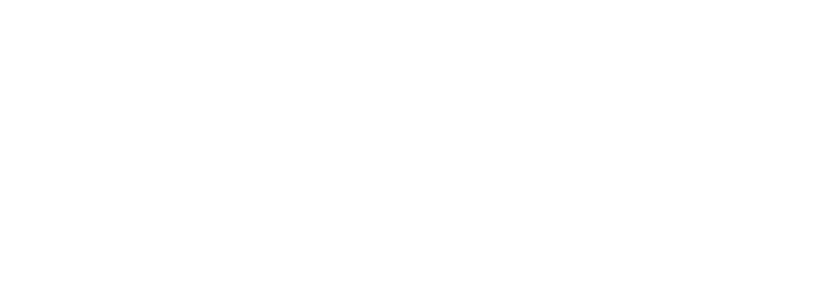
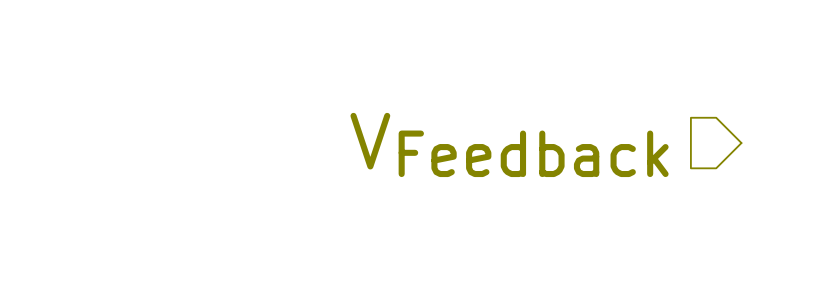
hierarchical label: none -> VFeedback (509, 144)

